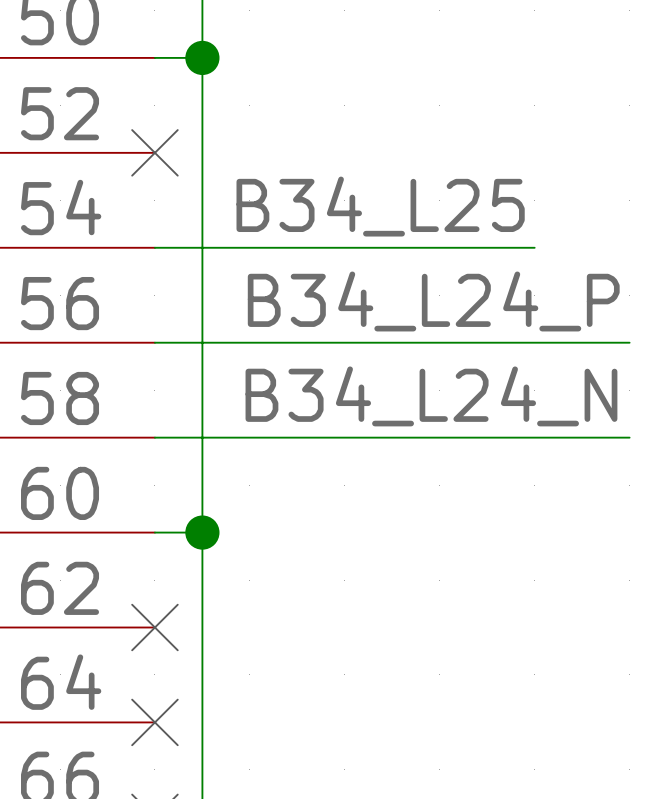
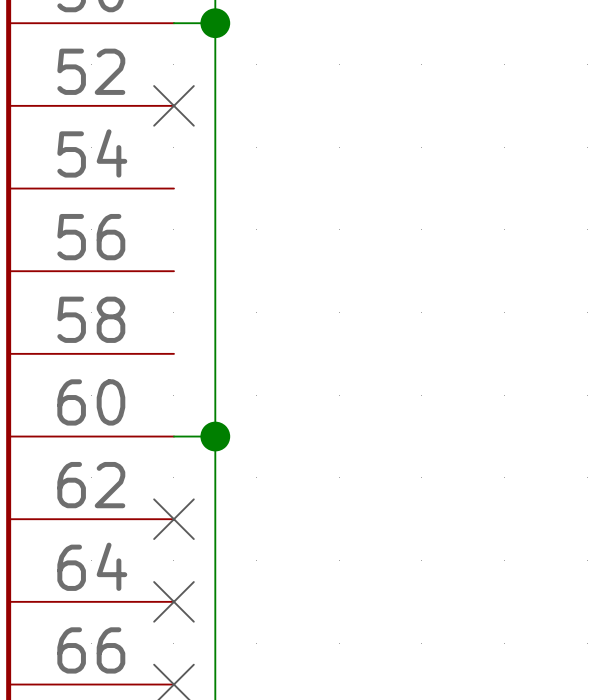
label: B34_L25 (380, 206) -> none
wire: (154, 247) (534, 247) -> none
label: B34_L24_P (433, 301) -> none
wire: (154, 342) (629, 342) -> none
label: B34_L24_N (431, 396) -> none
wire: (154, 437) (629, 437) -> none

